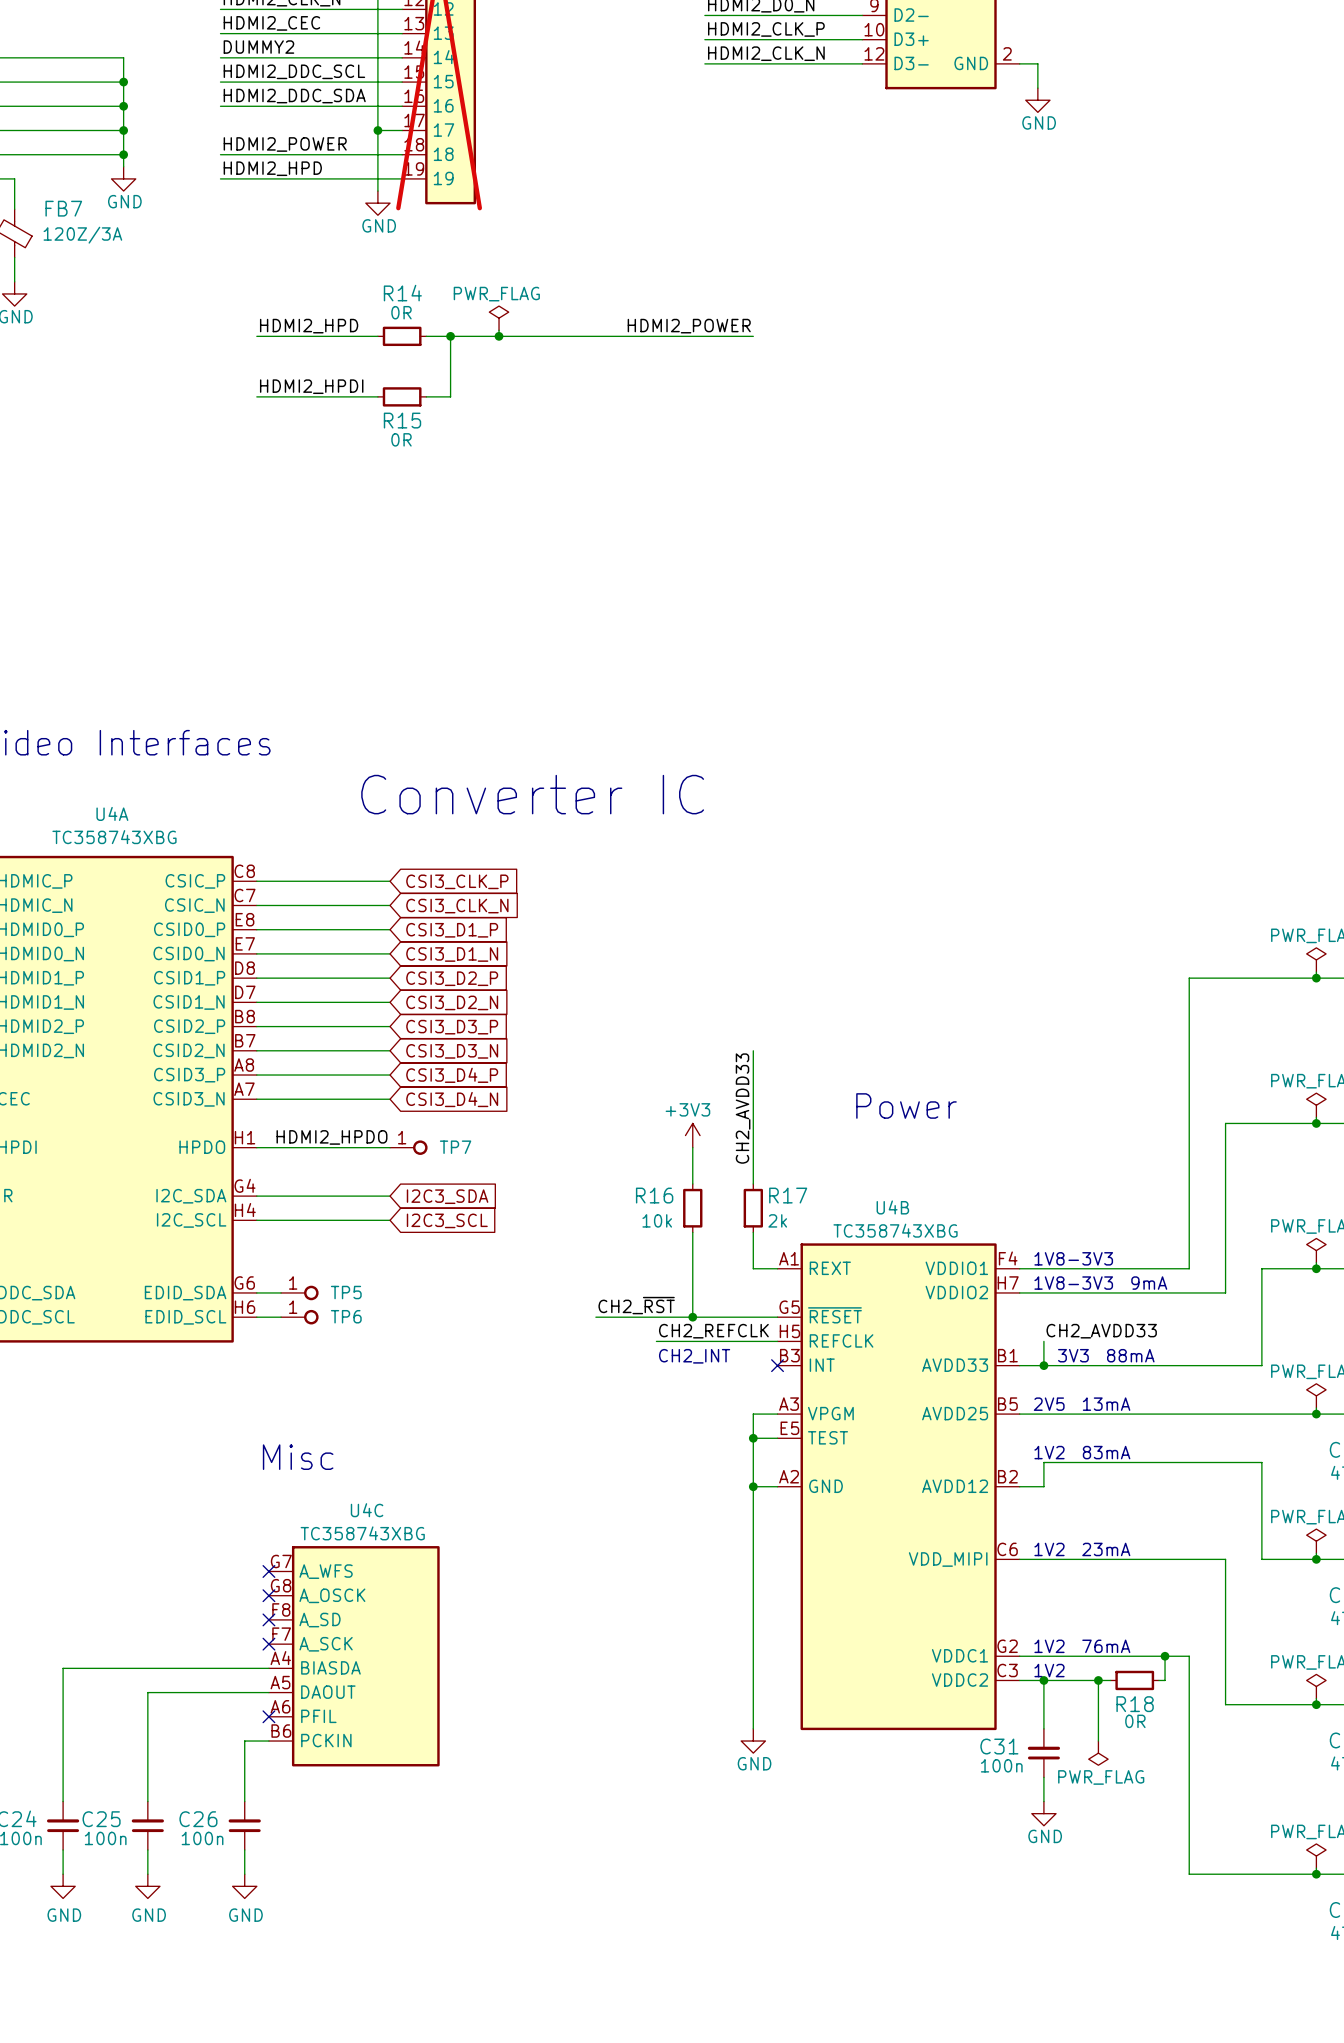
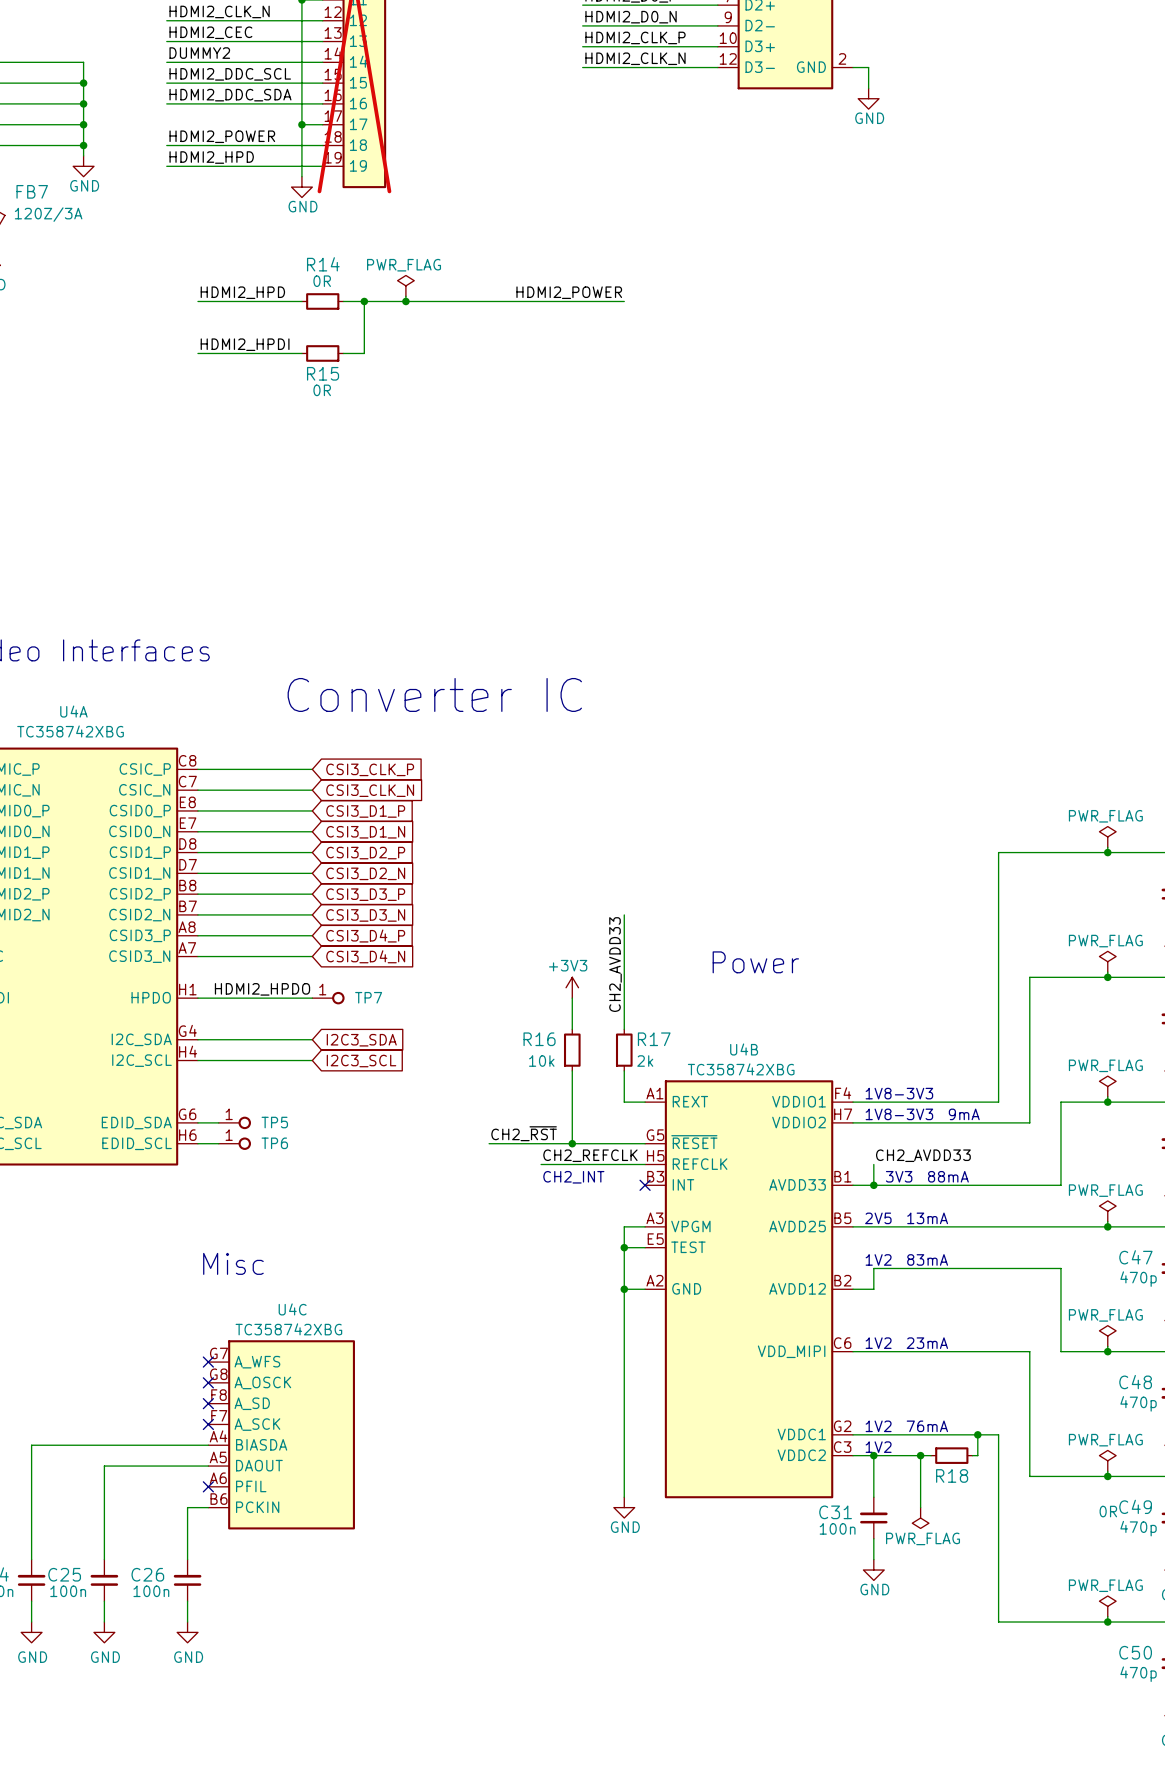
U4A text: TC358743XBG (114, 837) -> TC358742XBG (70, 731)
U4B text: TC358743XBG (895, 1230) -> TC358742XBG (741, 1069)
U4C text: TC358743XBG (362, 1533) -> TC358742XBG (288, 1329)
R18 text position: 0R (1135, 1721) -> 0R (1108, 1511)

